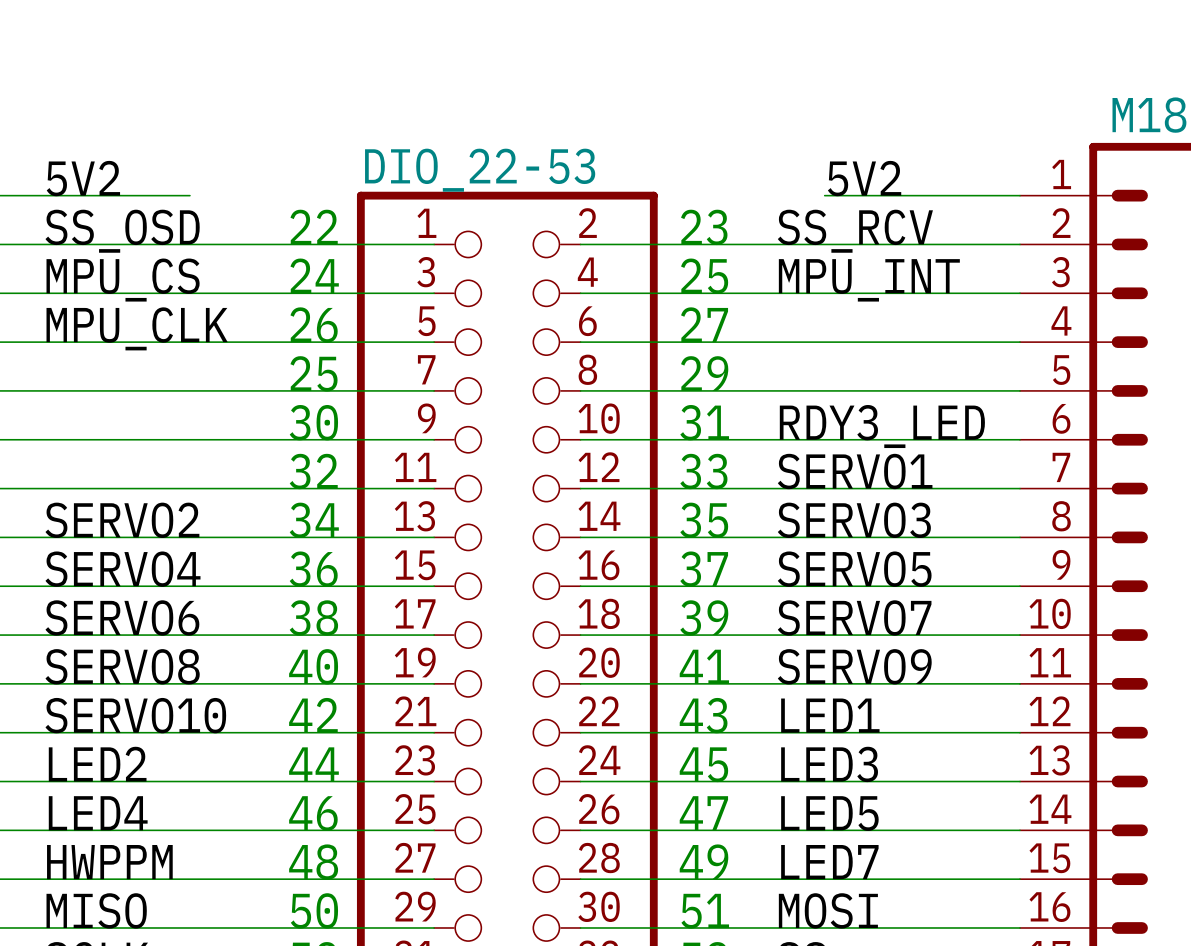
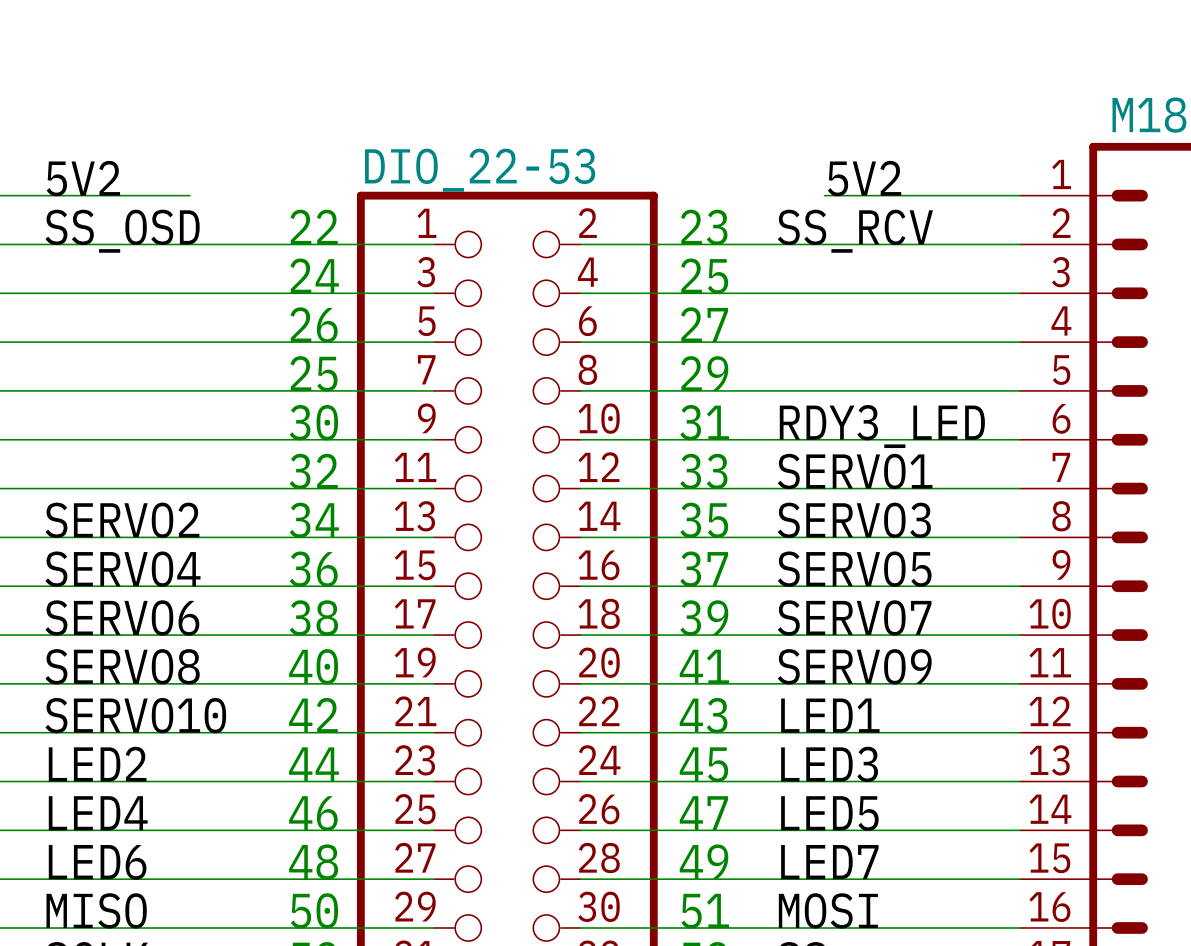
label: MPU_CS (123, 280) -> none
label: MPU_INT (869, 280) -> none
label: MPU_CLK (137, 328) -> none
label: HWPPM (109, 862) -> LED6 (97, 862)

